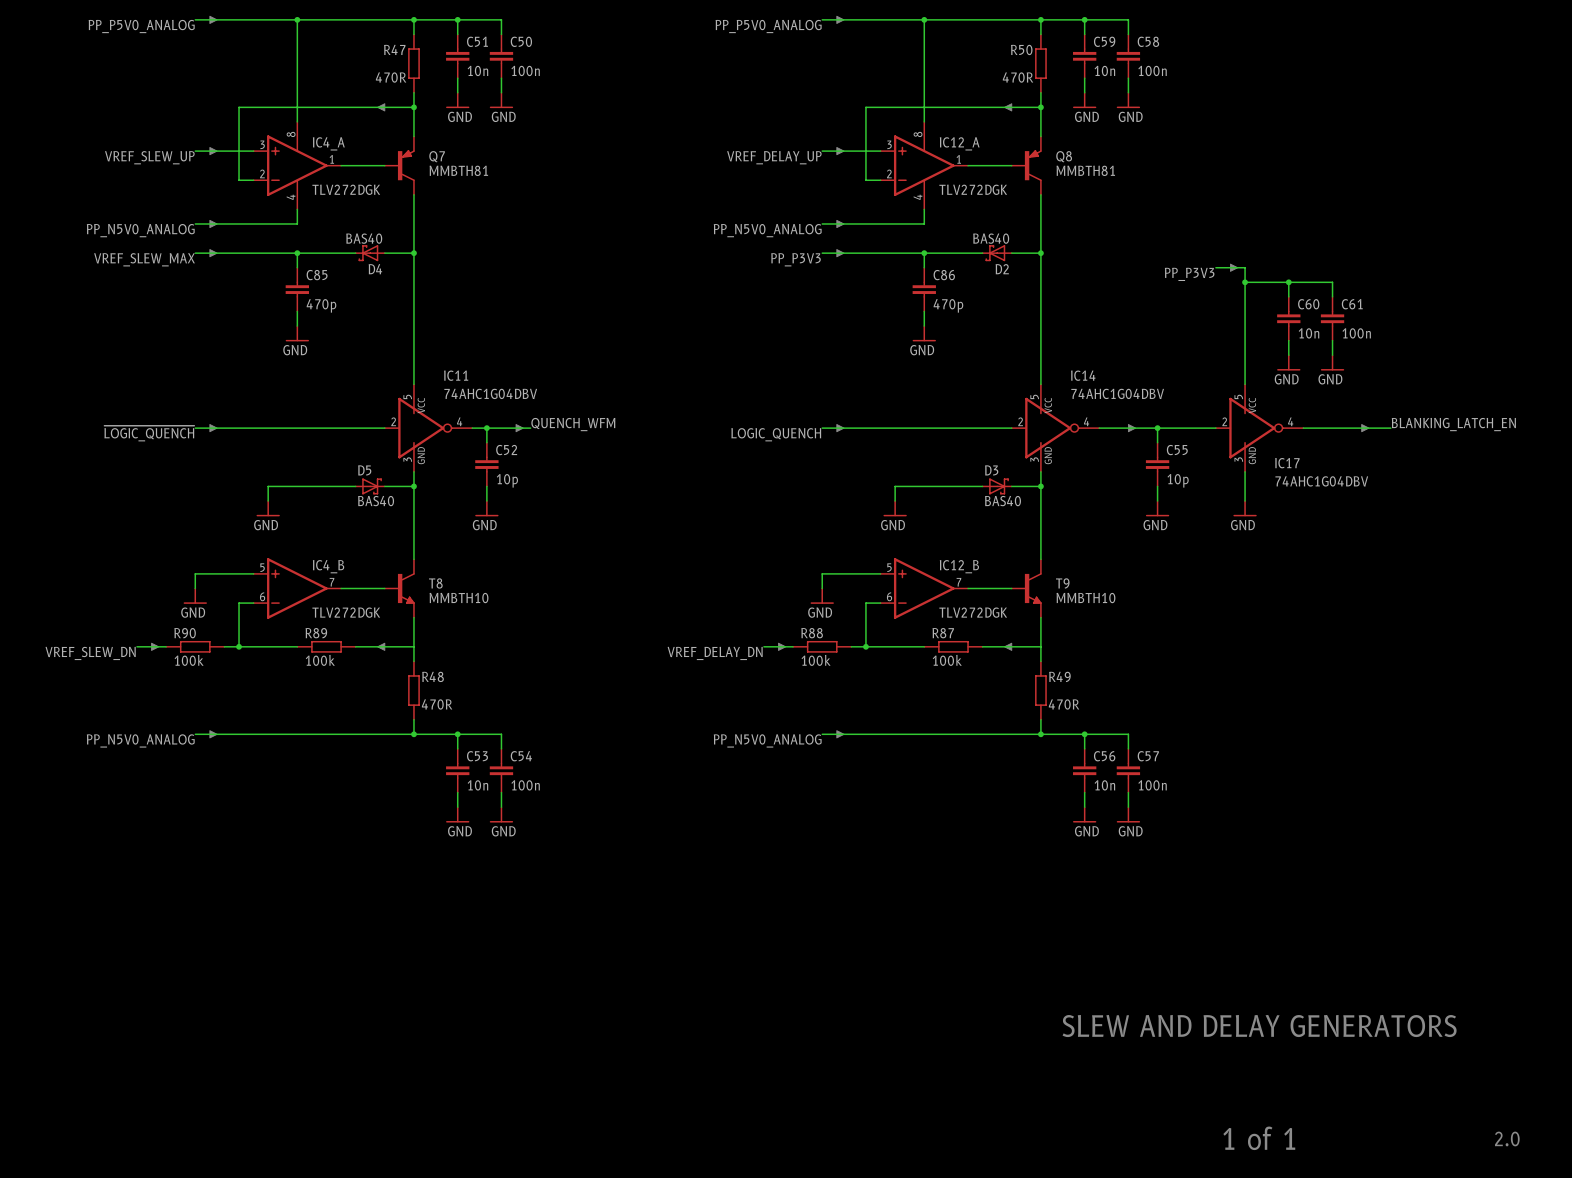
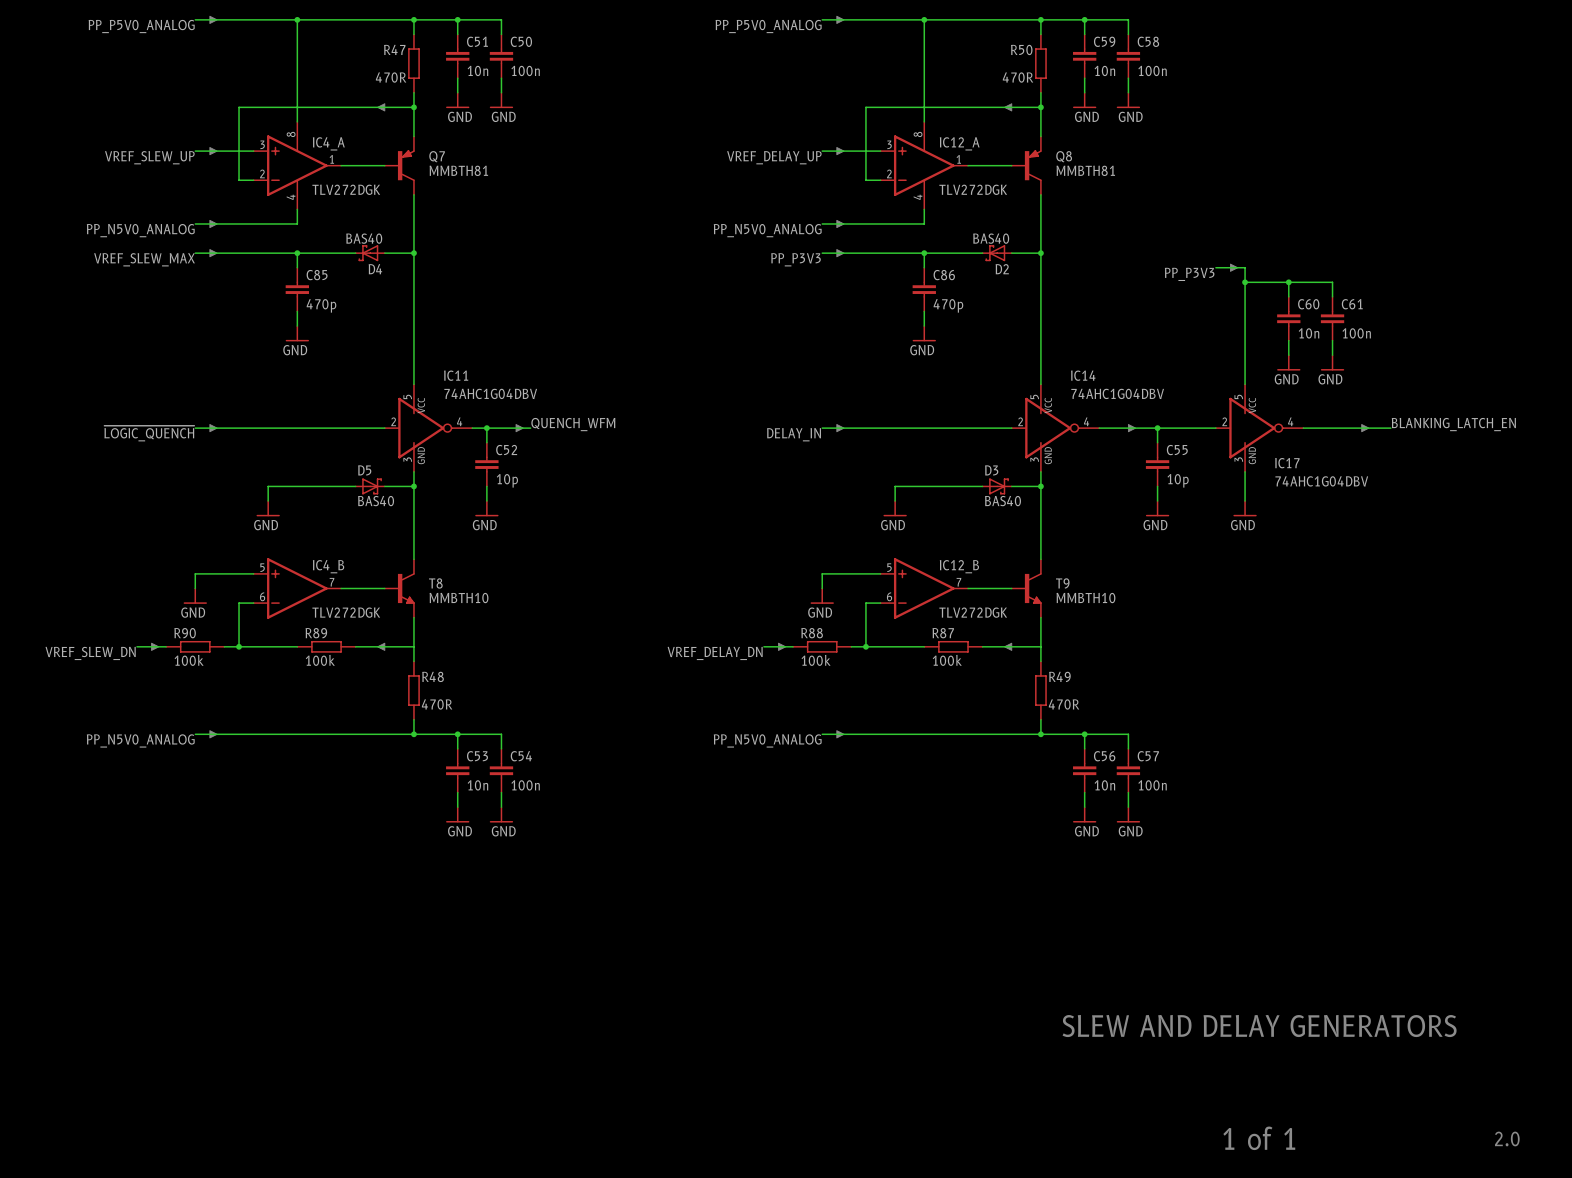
label: LOGIC_QUENCH (776, 434) -> DELAY_IN (794, 434)

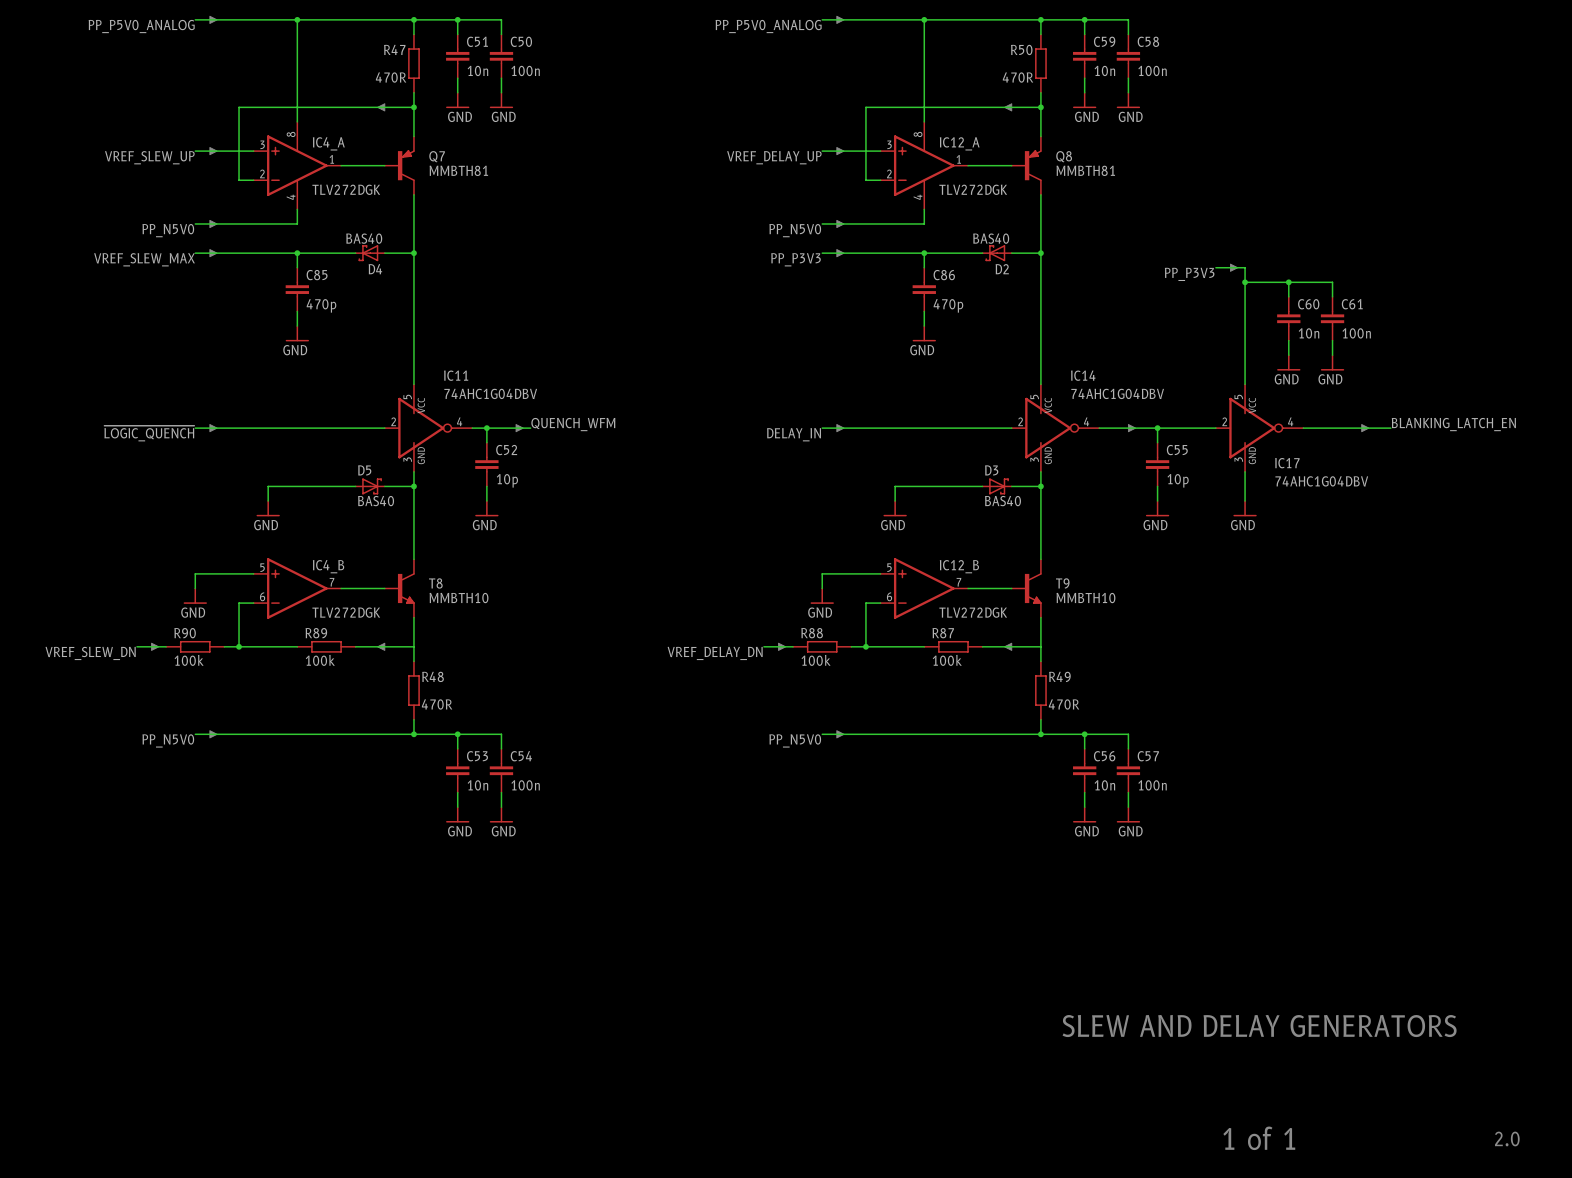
label: PP_N5V0_ANALOG (140, 230) -> PP_N5V0 (168, 230)
label: PP_N5V0_ANALOG (767, 230) -> PP_N5V0 (795, 230)
label: PP_N5V0_ANALOG (140, 740) -> PP_N5V0 (168, 740)
label: PP_N5V0_ANALOG (767, 740) -> PP_N5V0 (795, 740)

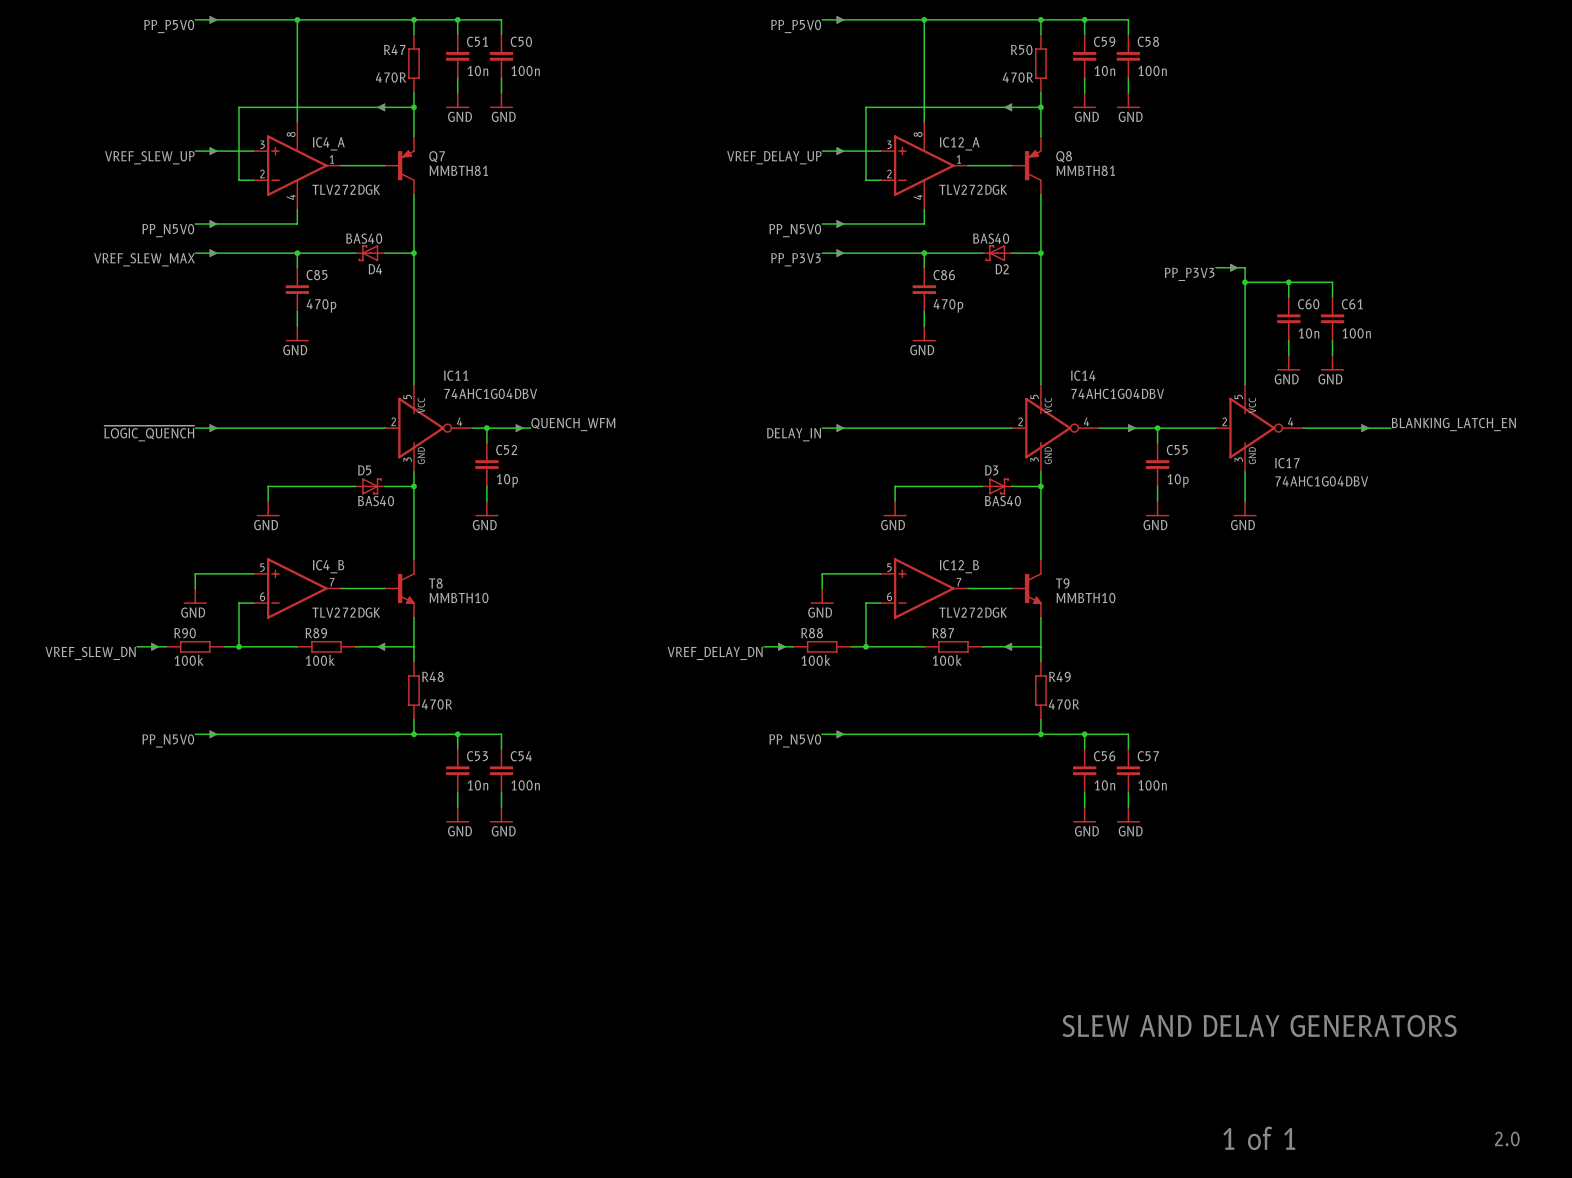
label: PP_P5V0_ANALOG (141, 26) -> PP_P5V0 (169, 26)
label: PP_P5V0_ANALOG (768, 26) -> PP_P5V0 (796, 26)

